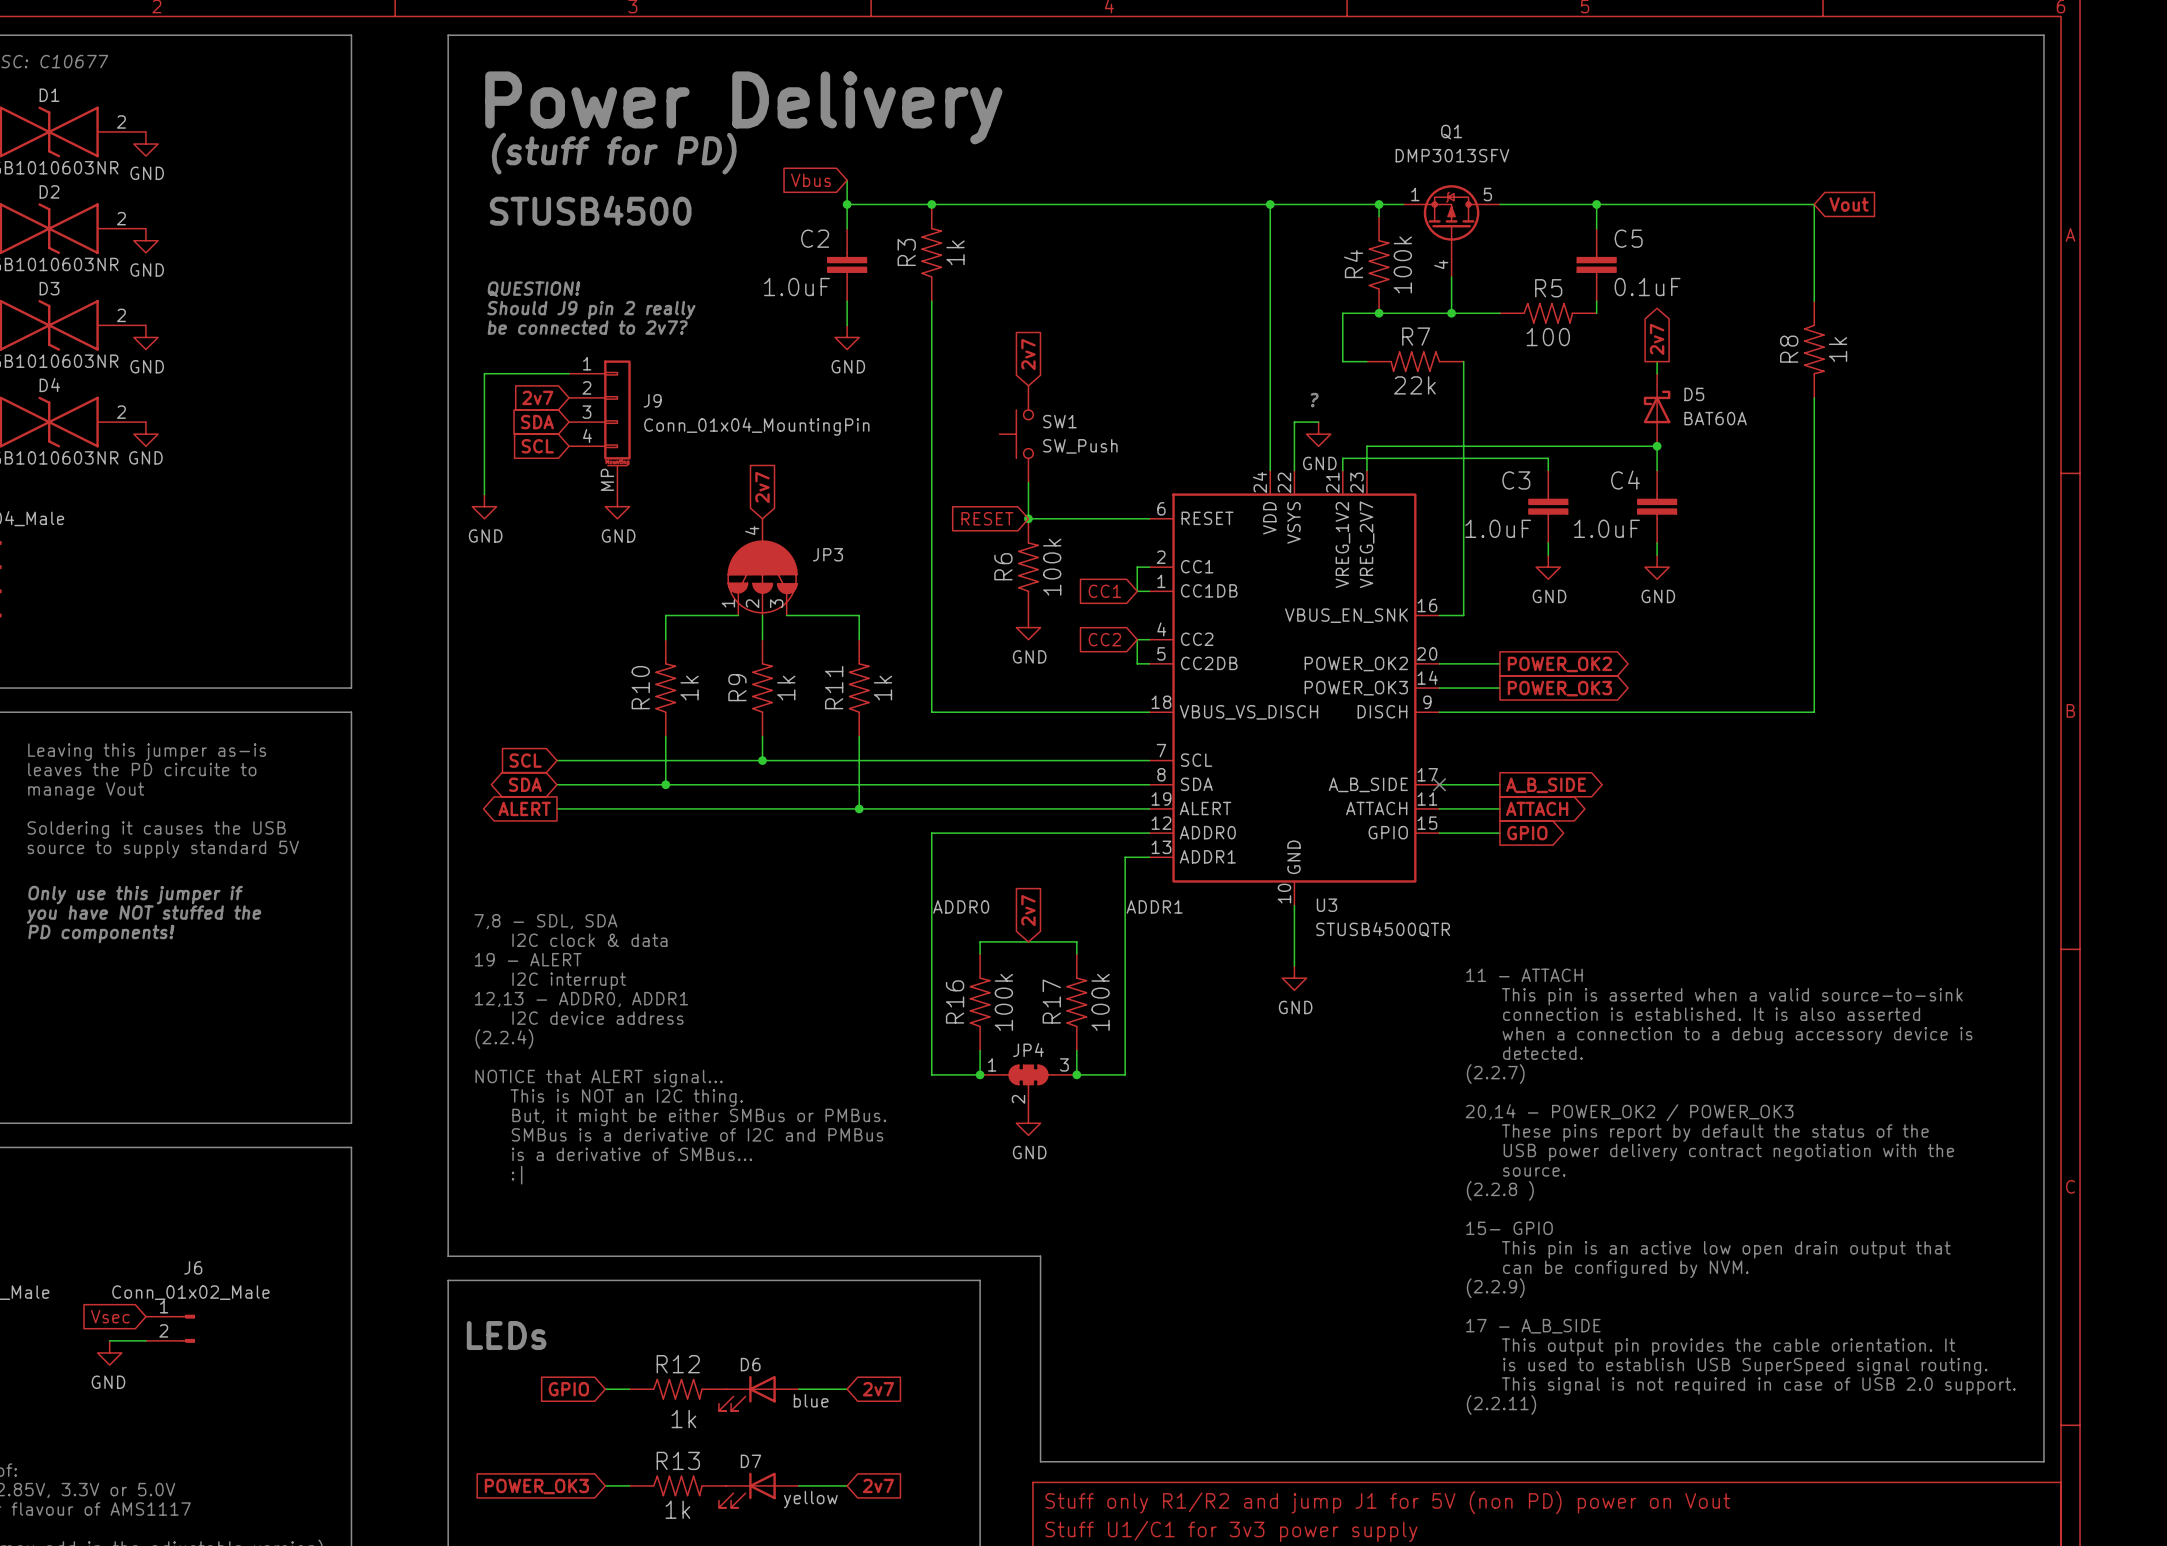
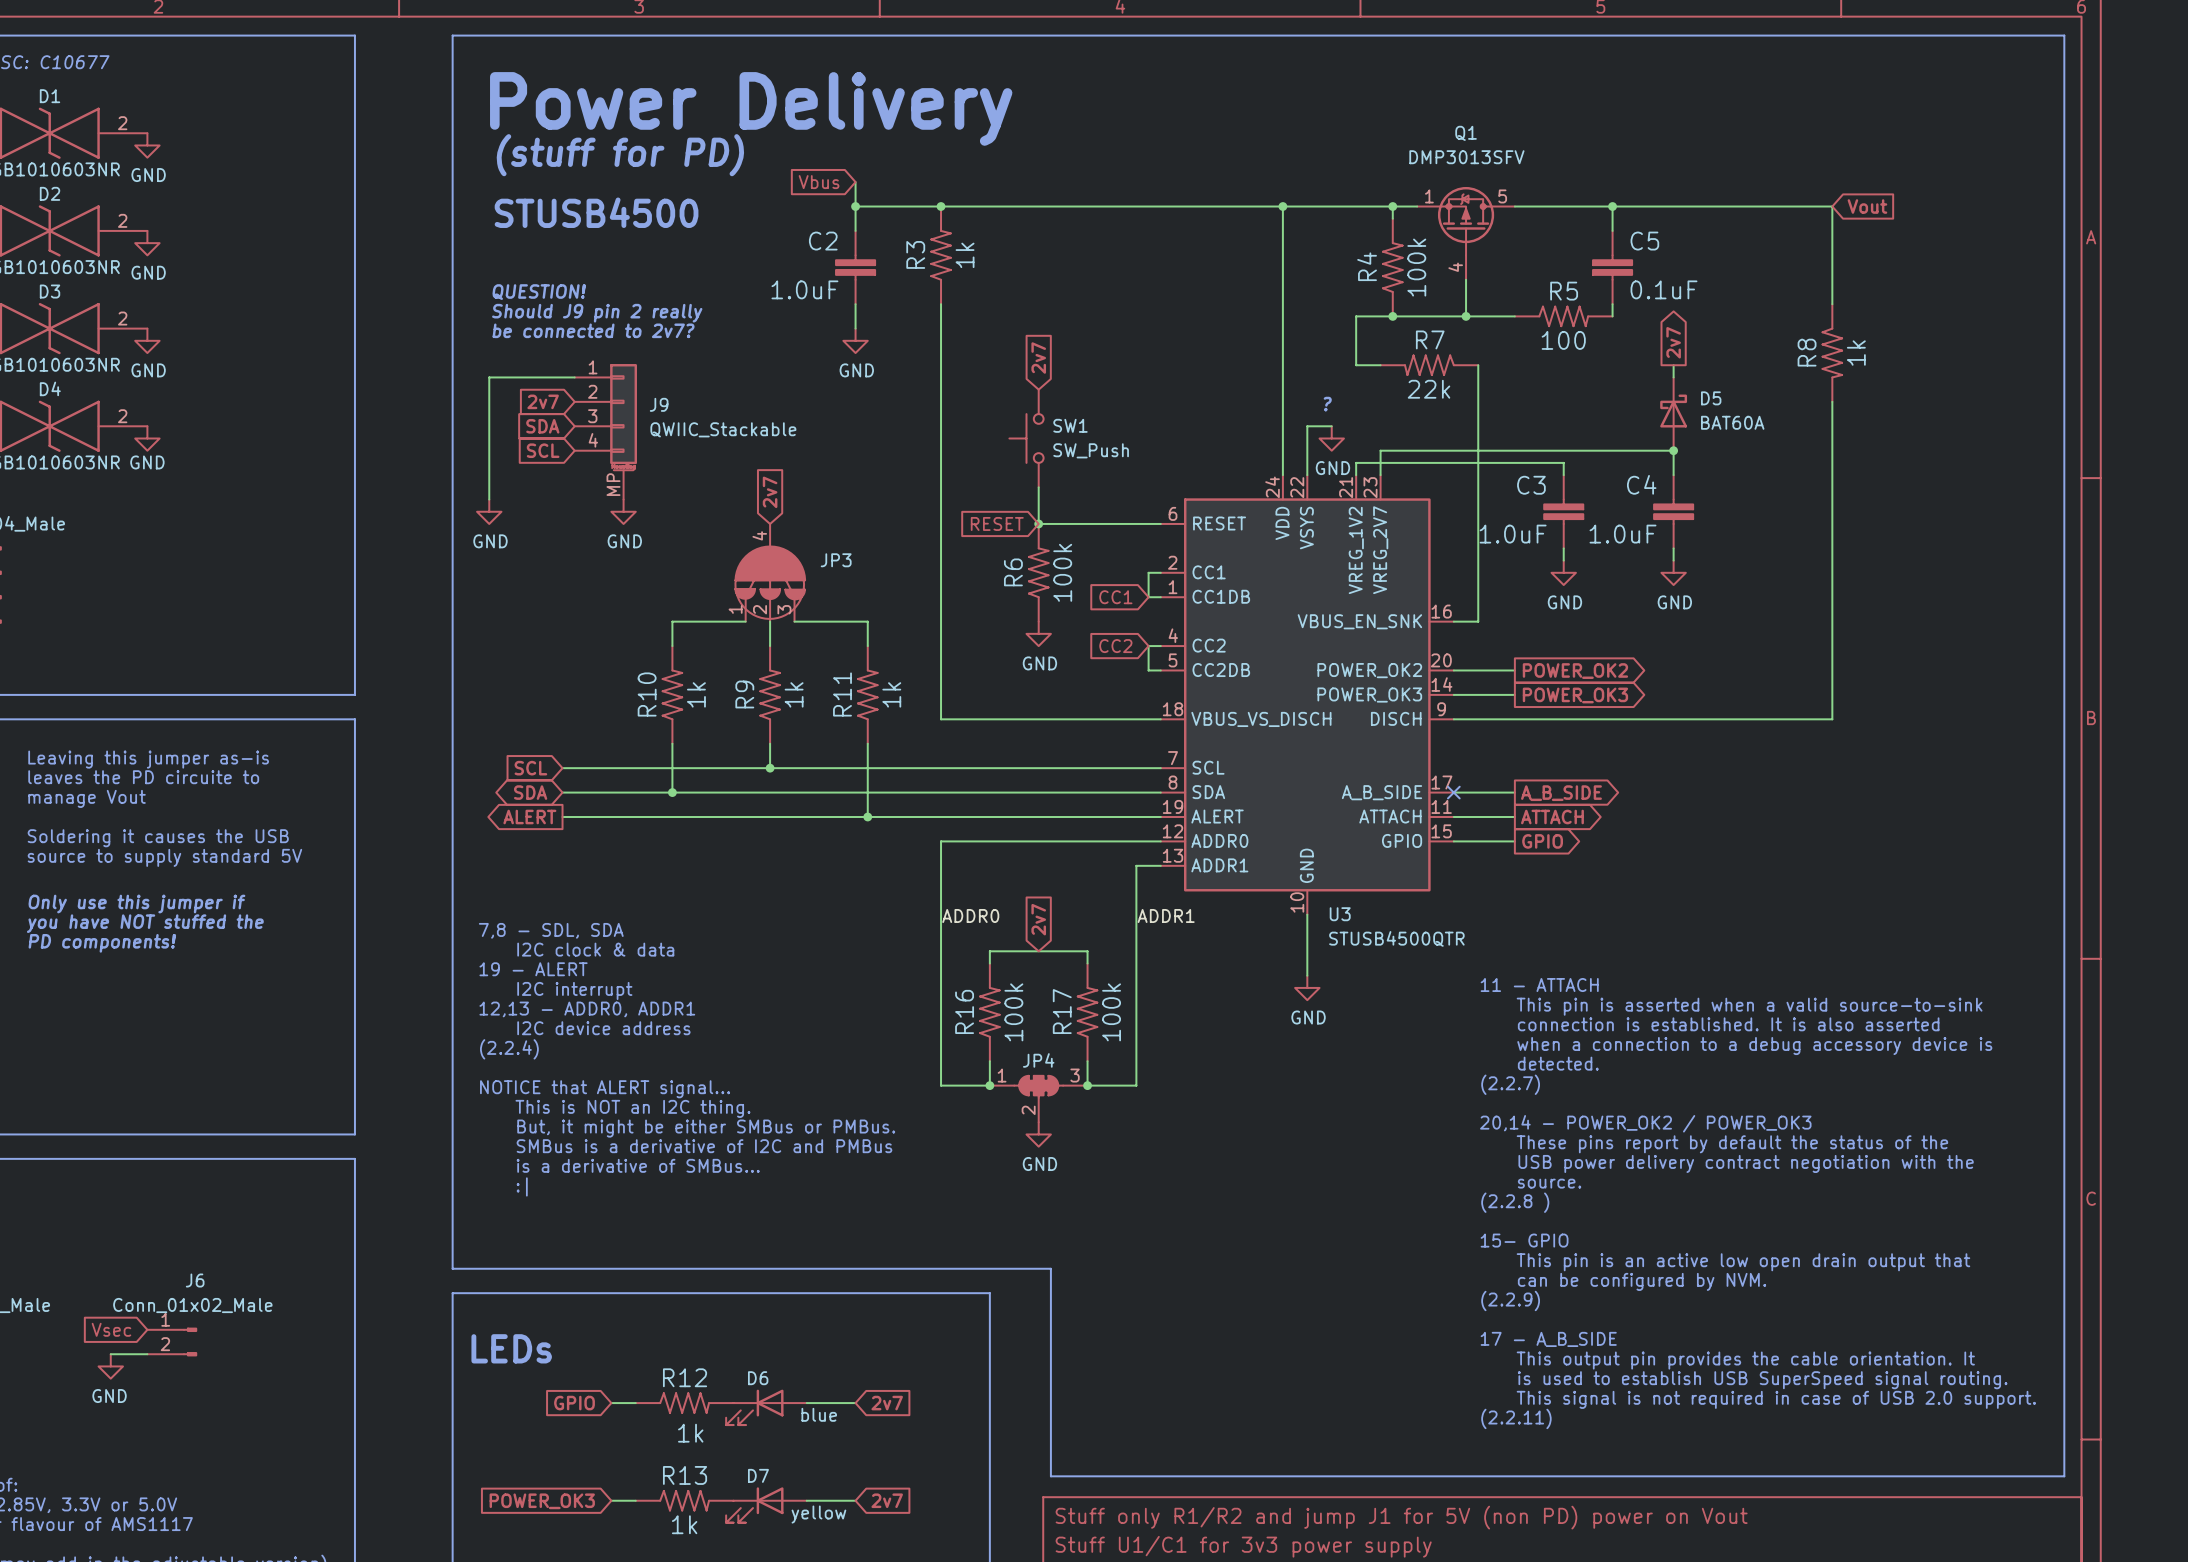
J9 value: Conn_01x04_MountingPin (756, 426) -> QWIIC_Stackable (723, 429)

